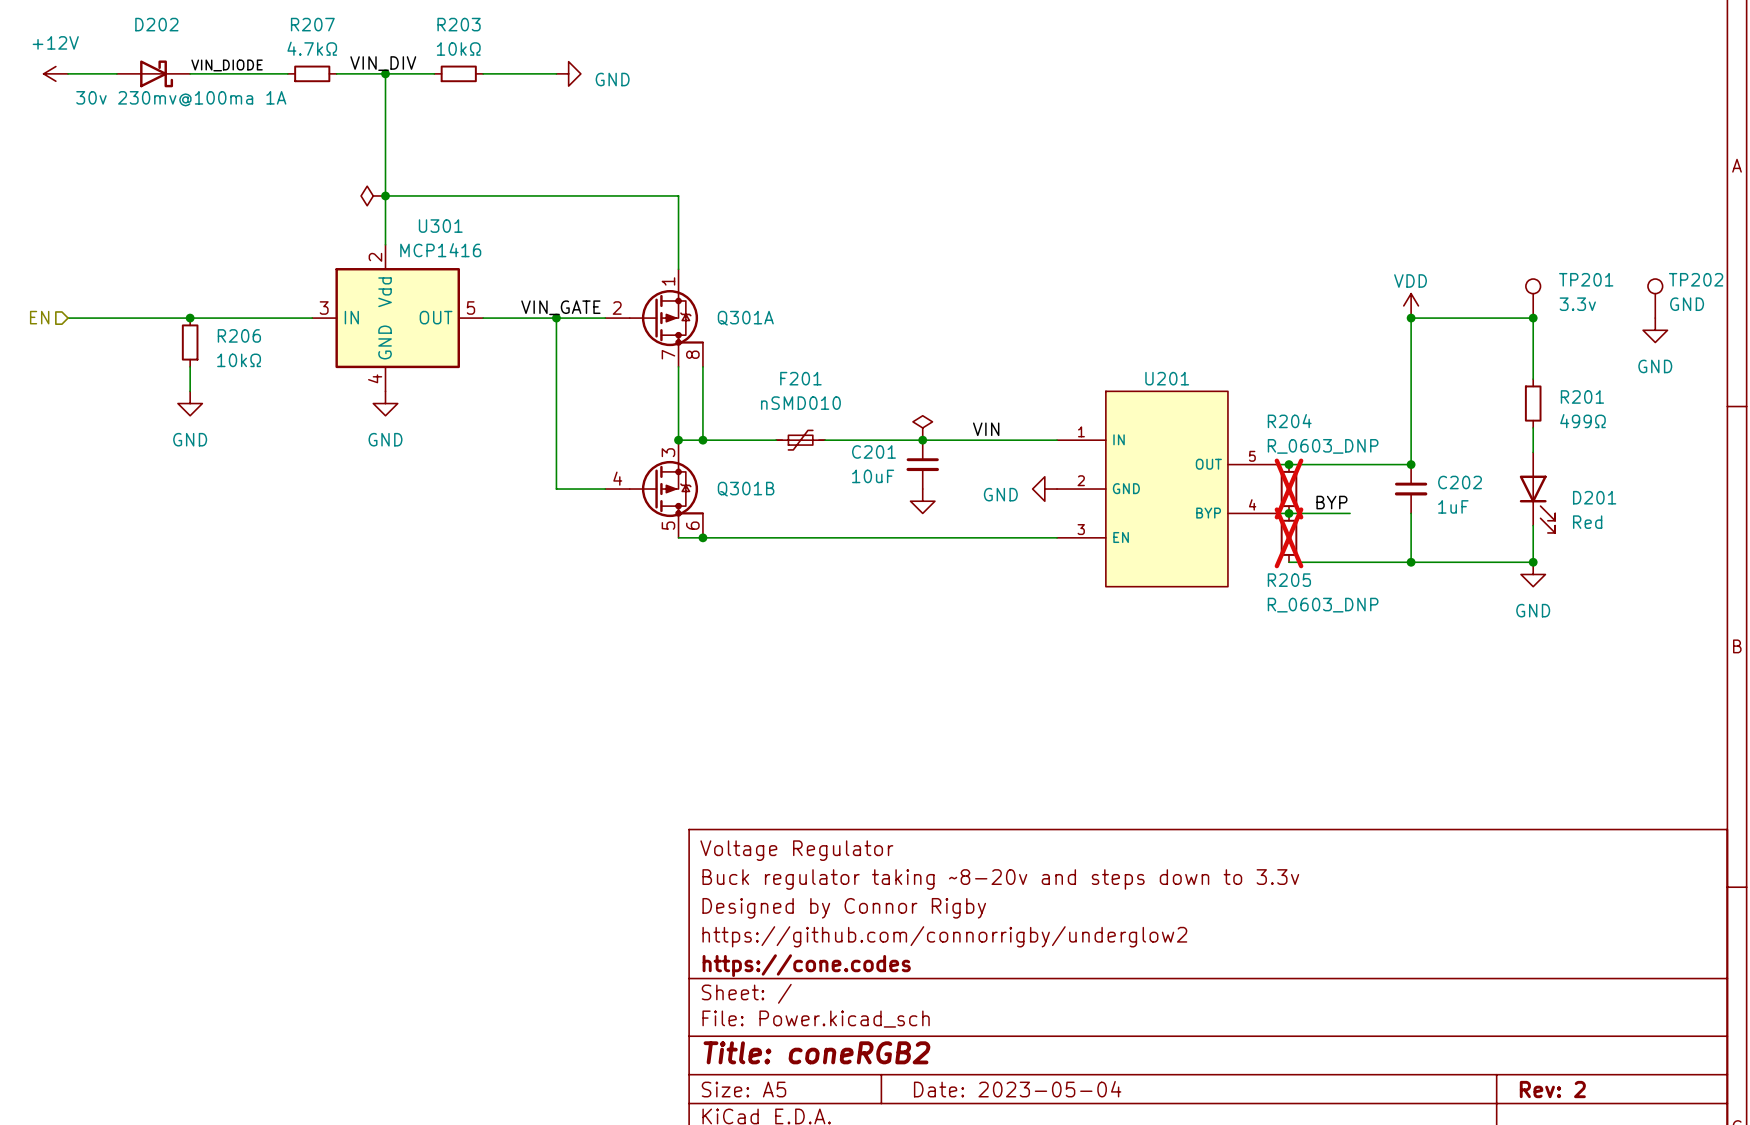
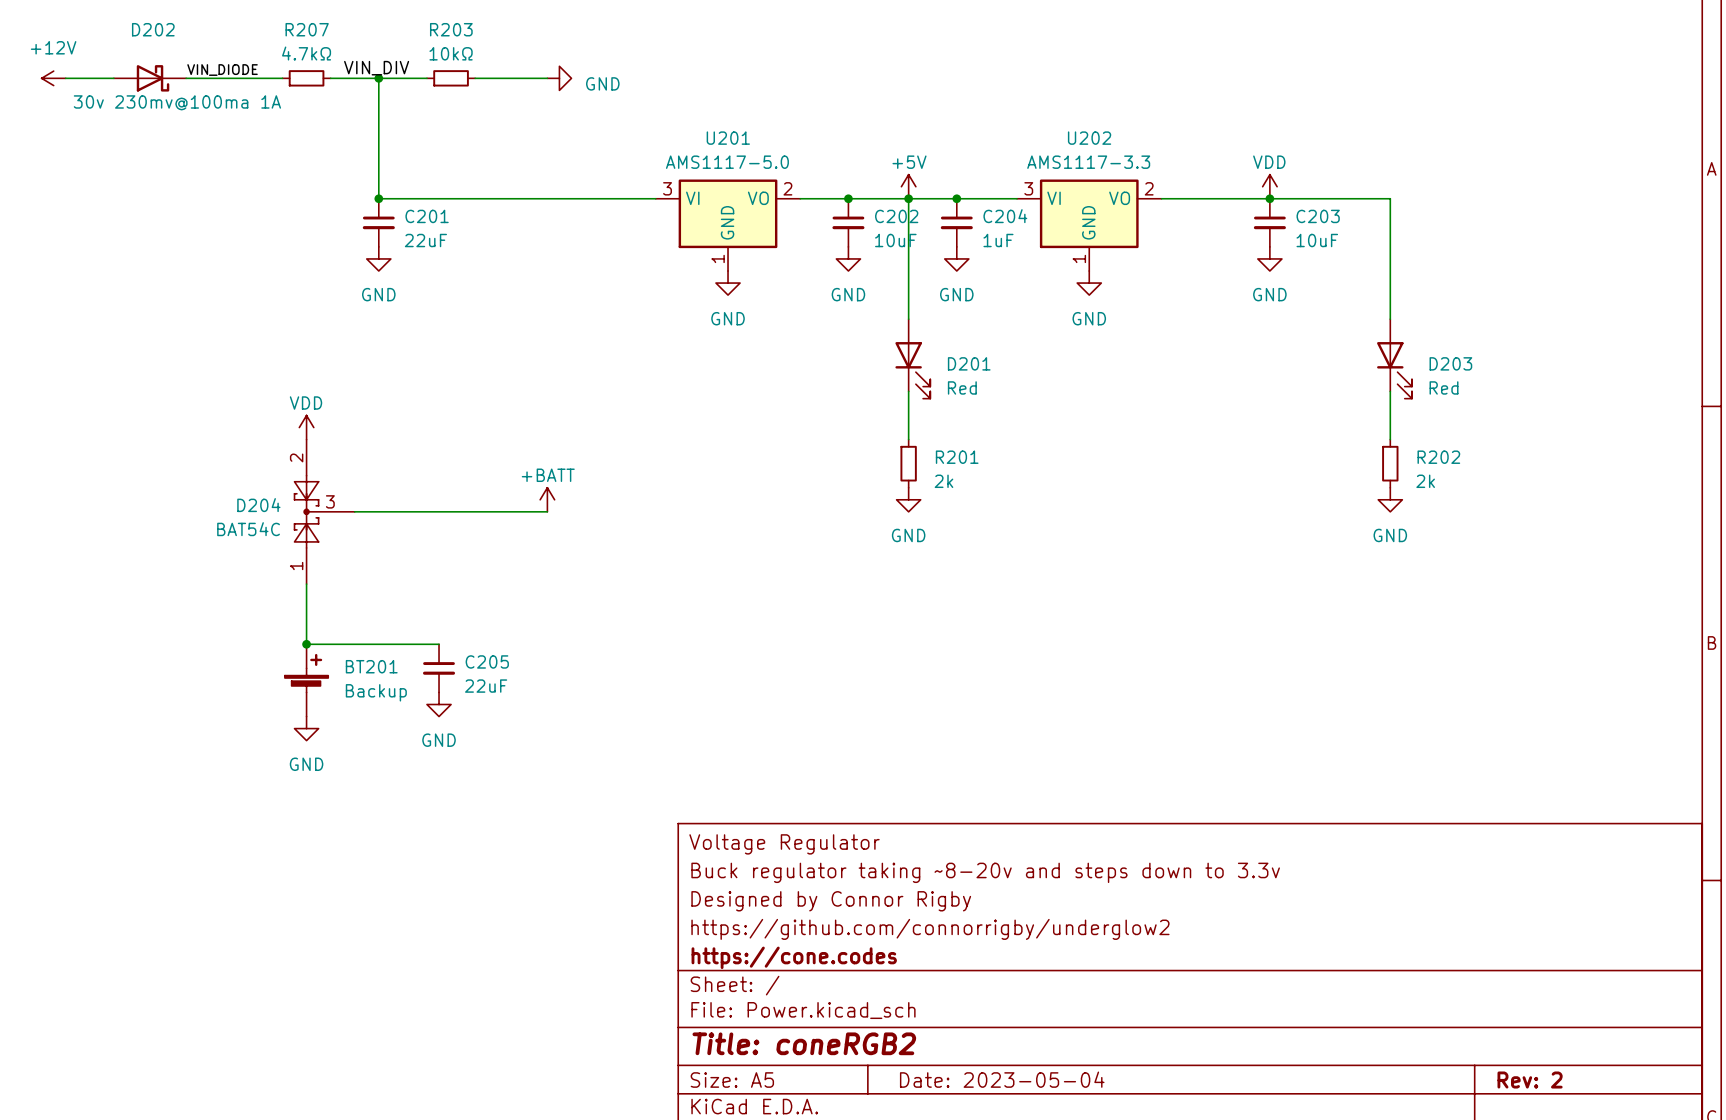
U201 value: none -> AMS1117-5.0 (727, 162)
power symbol: none -> +5V (908, 186)
power symbol: (373, 195) -> none
wire: (666, 195) (678, 195) (678, 269) -> none
wire: none -> (800, 198) (1017, 198)
junction: none -> (848, 198)
wire: none -> (908, 198) (908, 319)
junction: none -> (908, 198)
junction: none -> (956, 198)
wire: none -> (1161, 198) (1390, 198) (1390, 319)
junction: none -> (1269, 198)
C204: none -> (956, 222)
C203: none -> (1269, 222)
U202: none -> AMS1117-3.3 (1089, 225)
power symbol: none -> GND (378, 258)
power symbol: none -> GND (848, 258)
power symbol: none -> GND (956, 258)
power symbol: none -> GND (1269, 258)
power symbol: none -> GND (728, 283)
power symbol: none -> GND (1089, 283)
TP201: 3.3v (1533, 298) -> none
TP202: GND (1655, 298) -> none
power symbol position: VDD (1411, 305) -> VDD (1269, 186)
label: VIN_GATE (560, 307) -> none
hierarchical label: EN (39, 317) -> none
wire: (68, 318) (312, 318) -> none
junction: (190, 318) -> none
U301: MCP1416 (397, 318) -> none
wire: (483, 318) (605, 318) -> none
wire: (556, 318) (556, 489) (605, 489) -> none
junction: (556, 318) -> none
Q301A: (654, 318) -> none
junction: (1411, 318) -> none
junction: (1533, 318) -> none
power symbol: GND (1655, 330) -> none
R206: (190, 342) -> none
D203: none -> (1394, 358)
wire: (190, 366) (190, 391) -> none
wire: (678, 366) (678, 440) (776, 440) -> none
wire: (702, 366) (702, 440) -> none
U201 name position: U201 (1167, 378) -> U201 (728, 138)
wire: (1533, 379) (1533, 318) (1411, 318) (1411, 391) -> none
wire: none -> (908, 391) (908, 439)
U201 symbol: [1057, 391, 1277, 587] -> [655, 179, 801, 272]
power symbol: GND (190, 403) -> none
power symbol: GND (385, 403) -> none
R201 position: (1533, 403) -> (908, 463)
R201 text: 499Ω (1583, 421) -> 2k (943, 481)
power symbol: none -> VDD (306, 427)
power symbol: (922, 427) -> none
wire: (1533, 427) (1533, 452) -> none
label: VIN (986, 429) -> none
junction: (678, 440) -> none
junction: (702, 440) -> none
F201: nSMD010 (800, 440) -> none
wire: (825, 440) (1057, 440) -> none
junction: (922, 440) -> none
wire: (1411, 440) (1411, 464) (1276, 464) -> none
C201 name position: C201 (873, 451) -> C201 (427, 216)
C201 position: (922, 464) -> (378, 222)
junction: (1289, 464) -> none
junction: (1411, 464) -> none
R202: none -> (1390, 463)
C201 text: 10uF (873, 476) -> 22uF (425, 240)
Q301B: (654, 489) -> none
power symbol: GND (1044, 489) -> none
R204: R_0603_DNP (1289, 489) -> none
C202 position: (1411, 489) -> (848, 222)
D201 position: (1537, 492) -> (912, 358)
power symbol: none -> +BATT (547, 499)
label: BYP (1331, 502) -> none
C202 text: 1uF (1453, 506) -> 10uF (895, 240)
D204: none -> BAT54C (324, 511)
wire: none -> (354, 511) (547, 511)
wire: (1276, 513) (1350, 513) -> none
junction: (1289, 513) -> none
wire: (1411, 513) (1411, 562) -> none
wire: (1533, 525) (1533, 562) (1289, 562) -> none
wire: (678, 537) (1057, 537) -> none
junction: (702, 537) -> none
power symbol text: none -> GND (908, 535)
R205: R_0603_DNP (1289, 537) -> none
junction: (1411, 562) -> none
junction: (1533, 562) -> none
power symbol position: GND (1533, 574) -> GND (1390, 499)
wire: none -> (306, 584) (306, 644) (439, 644)
junction: none -> (306, 644)
C205: none -> (439, 668)
BT201: none -> Backup (306, 680)
power symbol: none -> GND (439, 704)
power symbol: none -> GND (306, 728)

